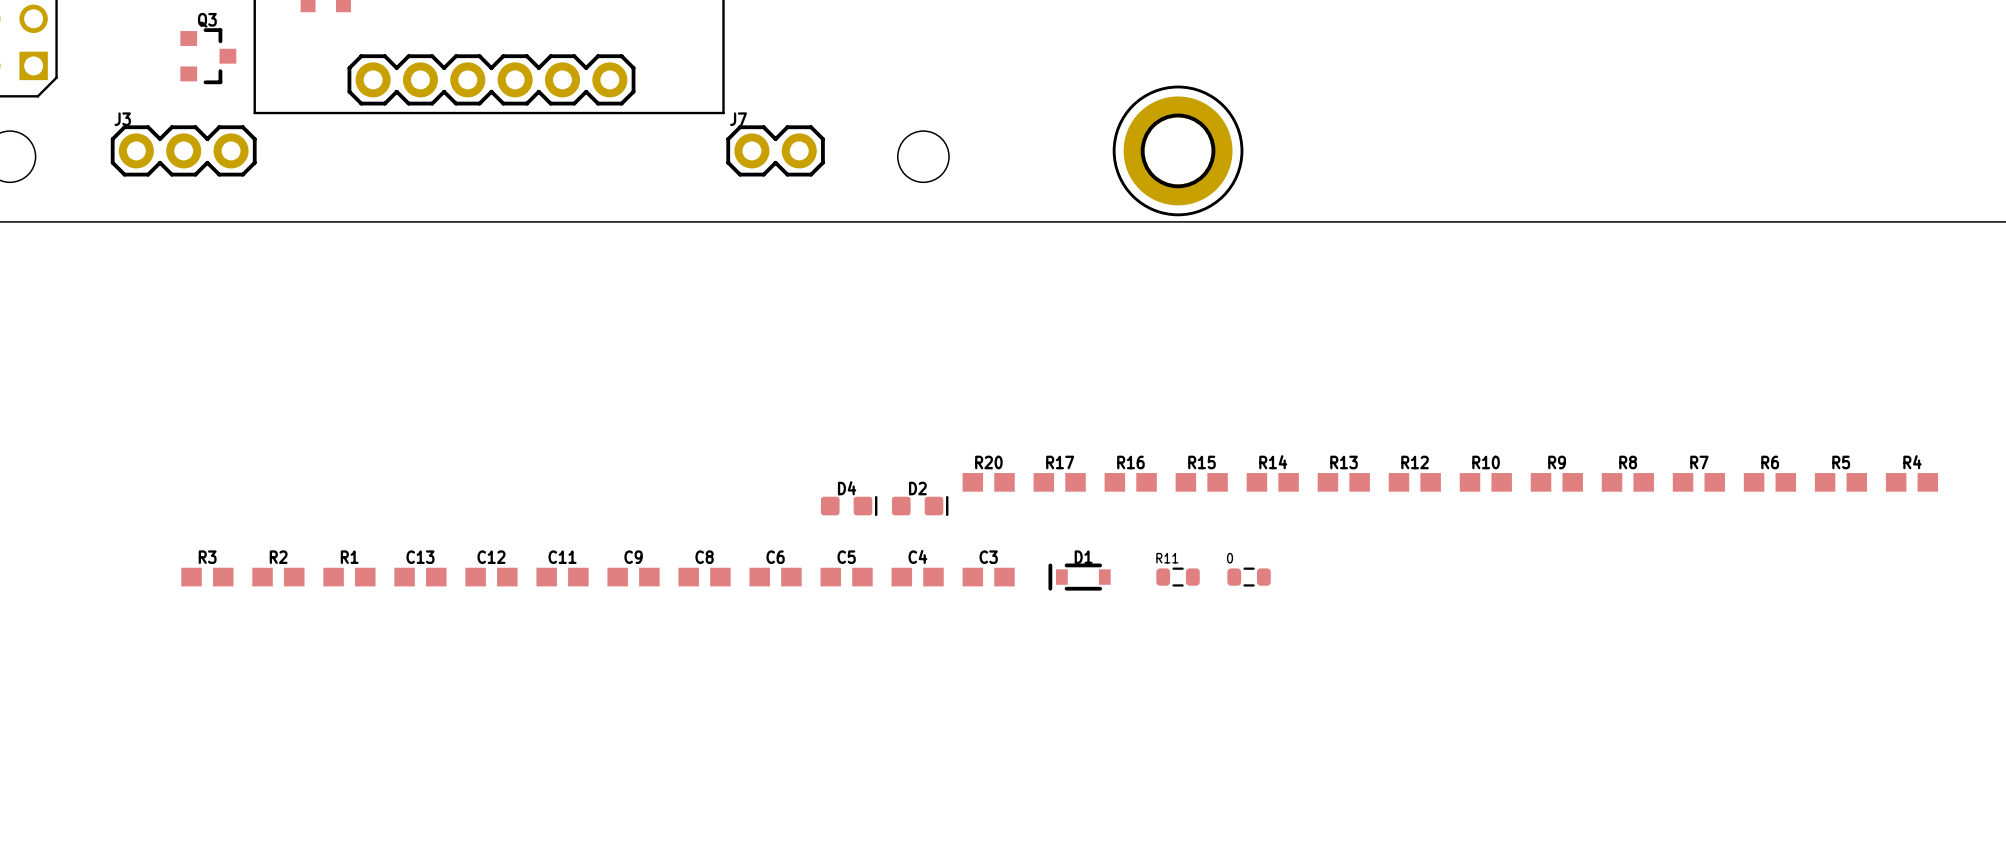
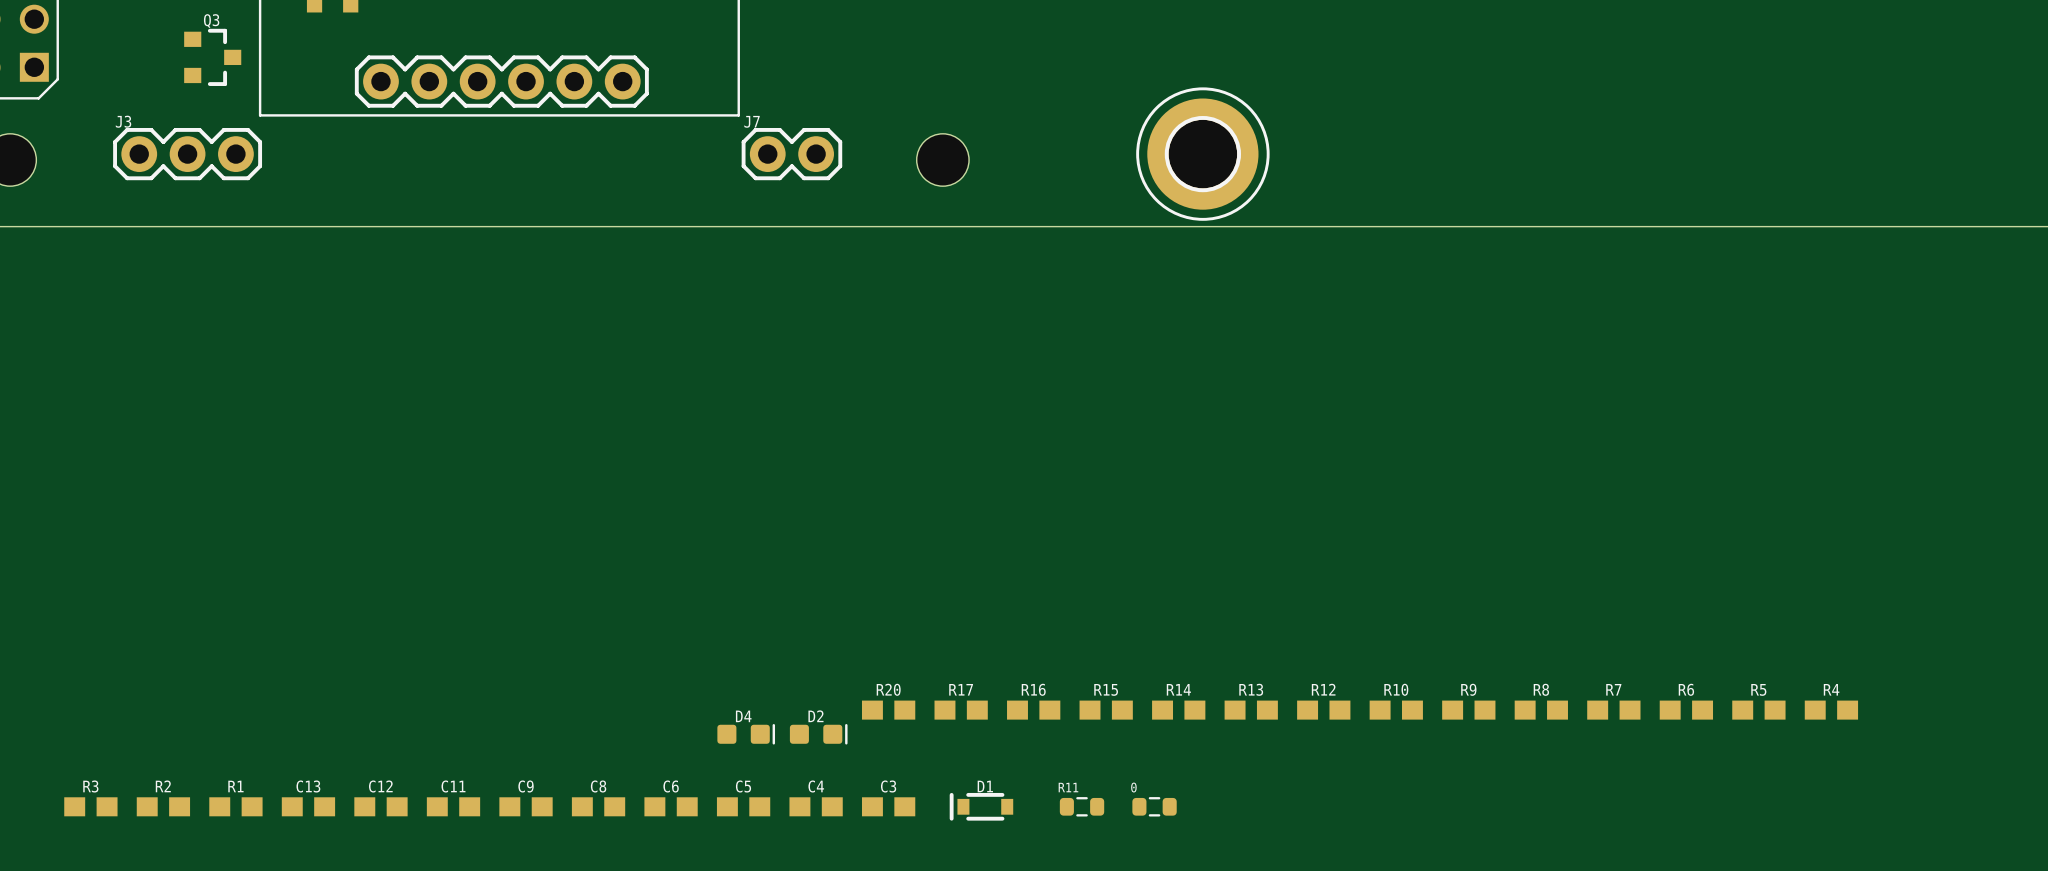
R20 position: (988, 482) -> (888, 710)
R17 position: (1059, 482) -> (961, 710)
R16 position: (1130, 482) -> (1033, 710)
R15 position: (1201, 482) -> (1106, 710)
R14 position: (1272, 482) -> (1178, 710)
R13 position: (1343, 482) -> (1251, 710)
R12 position: (1414, 482) -> (1323, 710)
R10 position: (1485, 482) -> (1396, 710)
R9 position: (1556, 482) -> (1468, 710)
R8 position: (1627, 482) -> (1541, 710)
R7 position: (1698, 482) -> (1613, 710)
R6 position: (1769, 482) -> (1686, 710)
R5 position: (1840, 482) -> (1758, 710)
R4 position: (1911, 482) -> (1831, 710)
D4 position: (849, 506) -> (746, 734)
D2 position: (920, 506) -> (818, 734)
R3 position: (207, 577) -> (90, 806)
R2 position: (278, 577) -> (163, 806)
R1 position: (349, 577) -> (235, 806)
C13 position: (420, 577) -> (308, 806)
C12 position: (491, 577) -> (380, 806)
C11 position: (562, 577) -> (453, 806)
C9 position: (633, 577) -> (526, 806)
C8 position: (704, 577) -> (598, 806)
C6 position: (775, 577) -> (671, 806)
C5 position: (846, 577) -> (743, 806)
C4 position: (917, 577) -> (816, 806)
C3 position: (988, 577) -> (888, 806)
D1 position: (1079, 577) -> (981, 806)
R11 position: (1178, 577) -> (1082, 806)
0 position: (1249, 577) -> (1154, 806)

